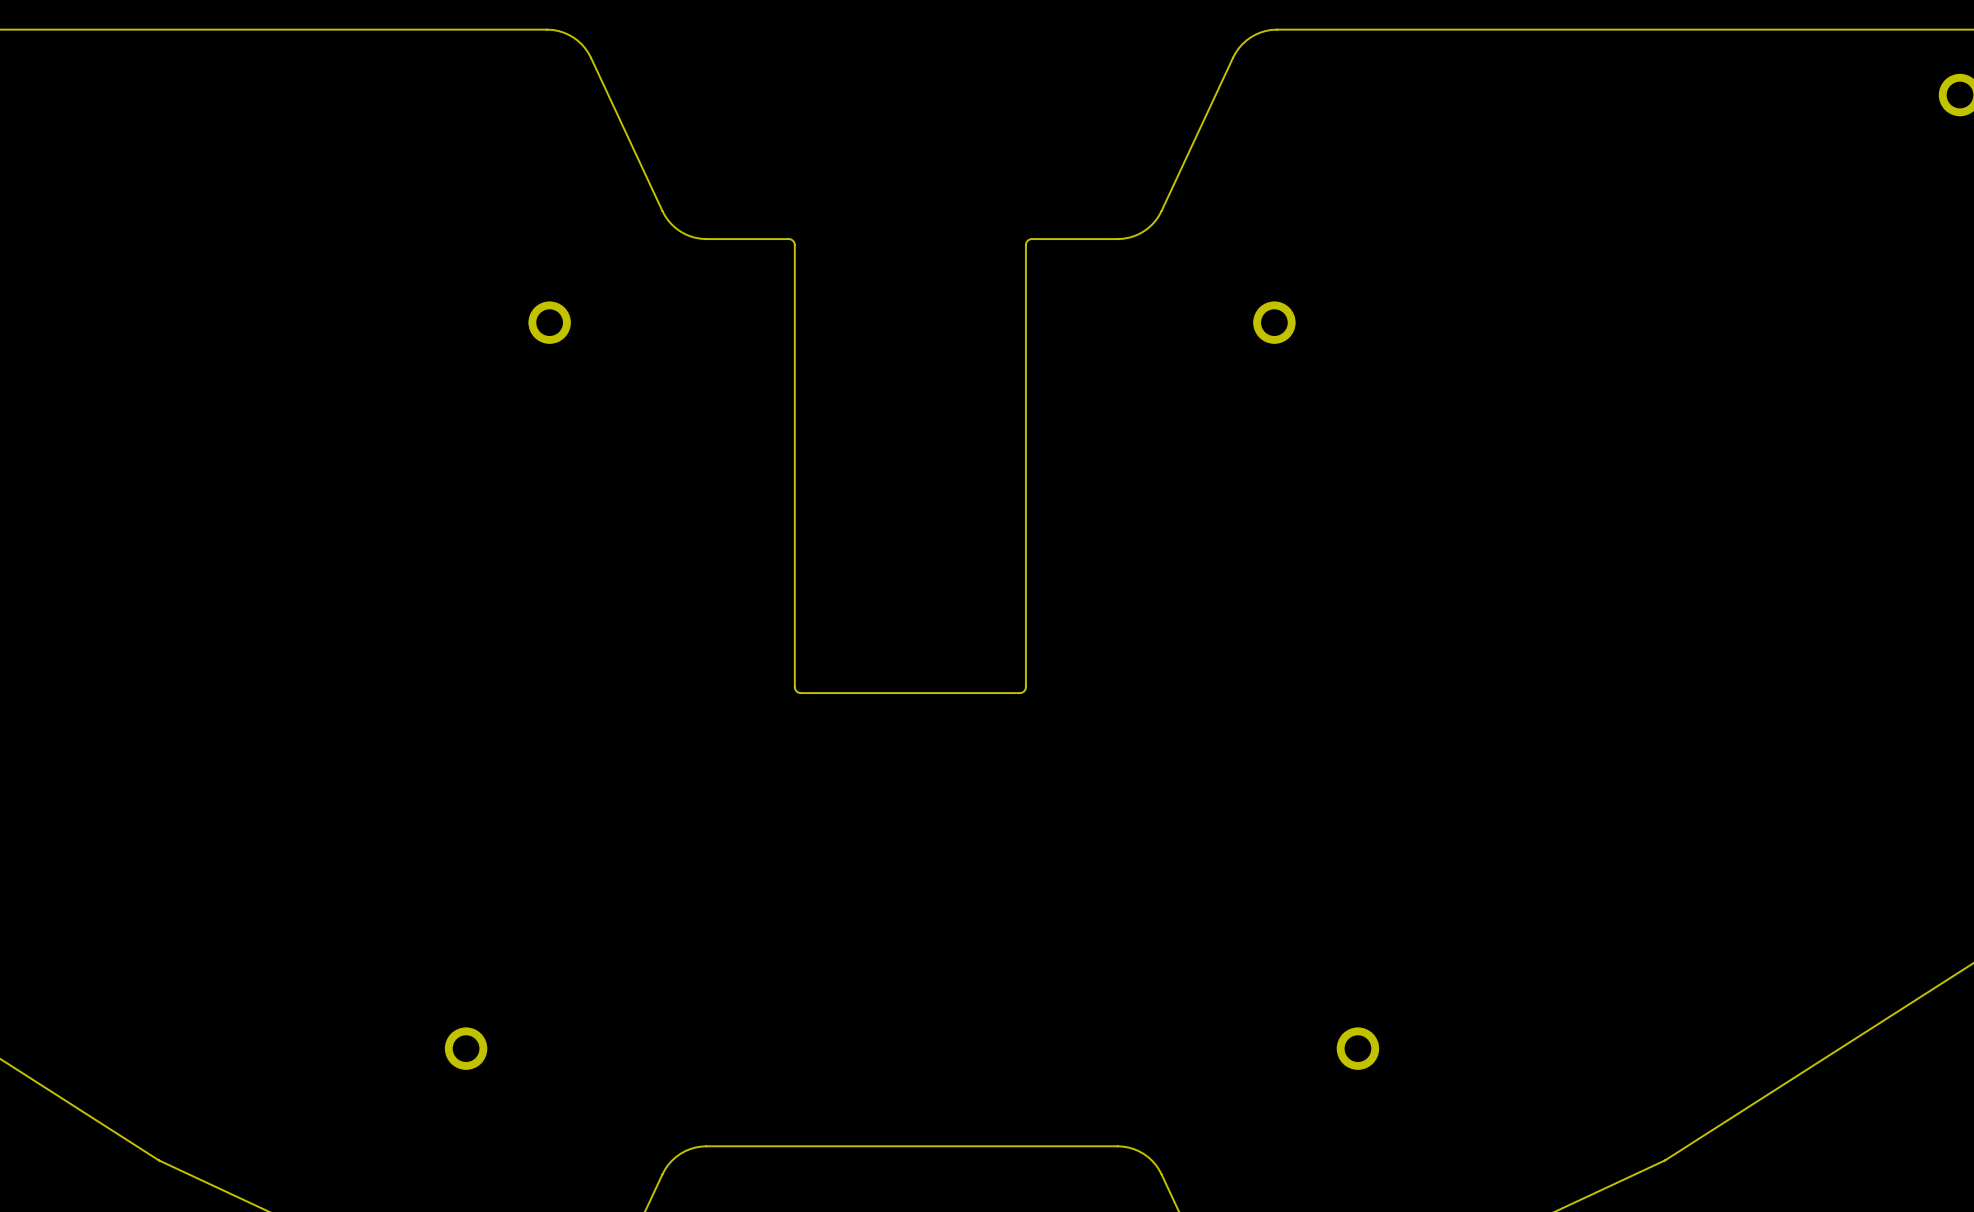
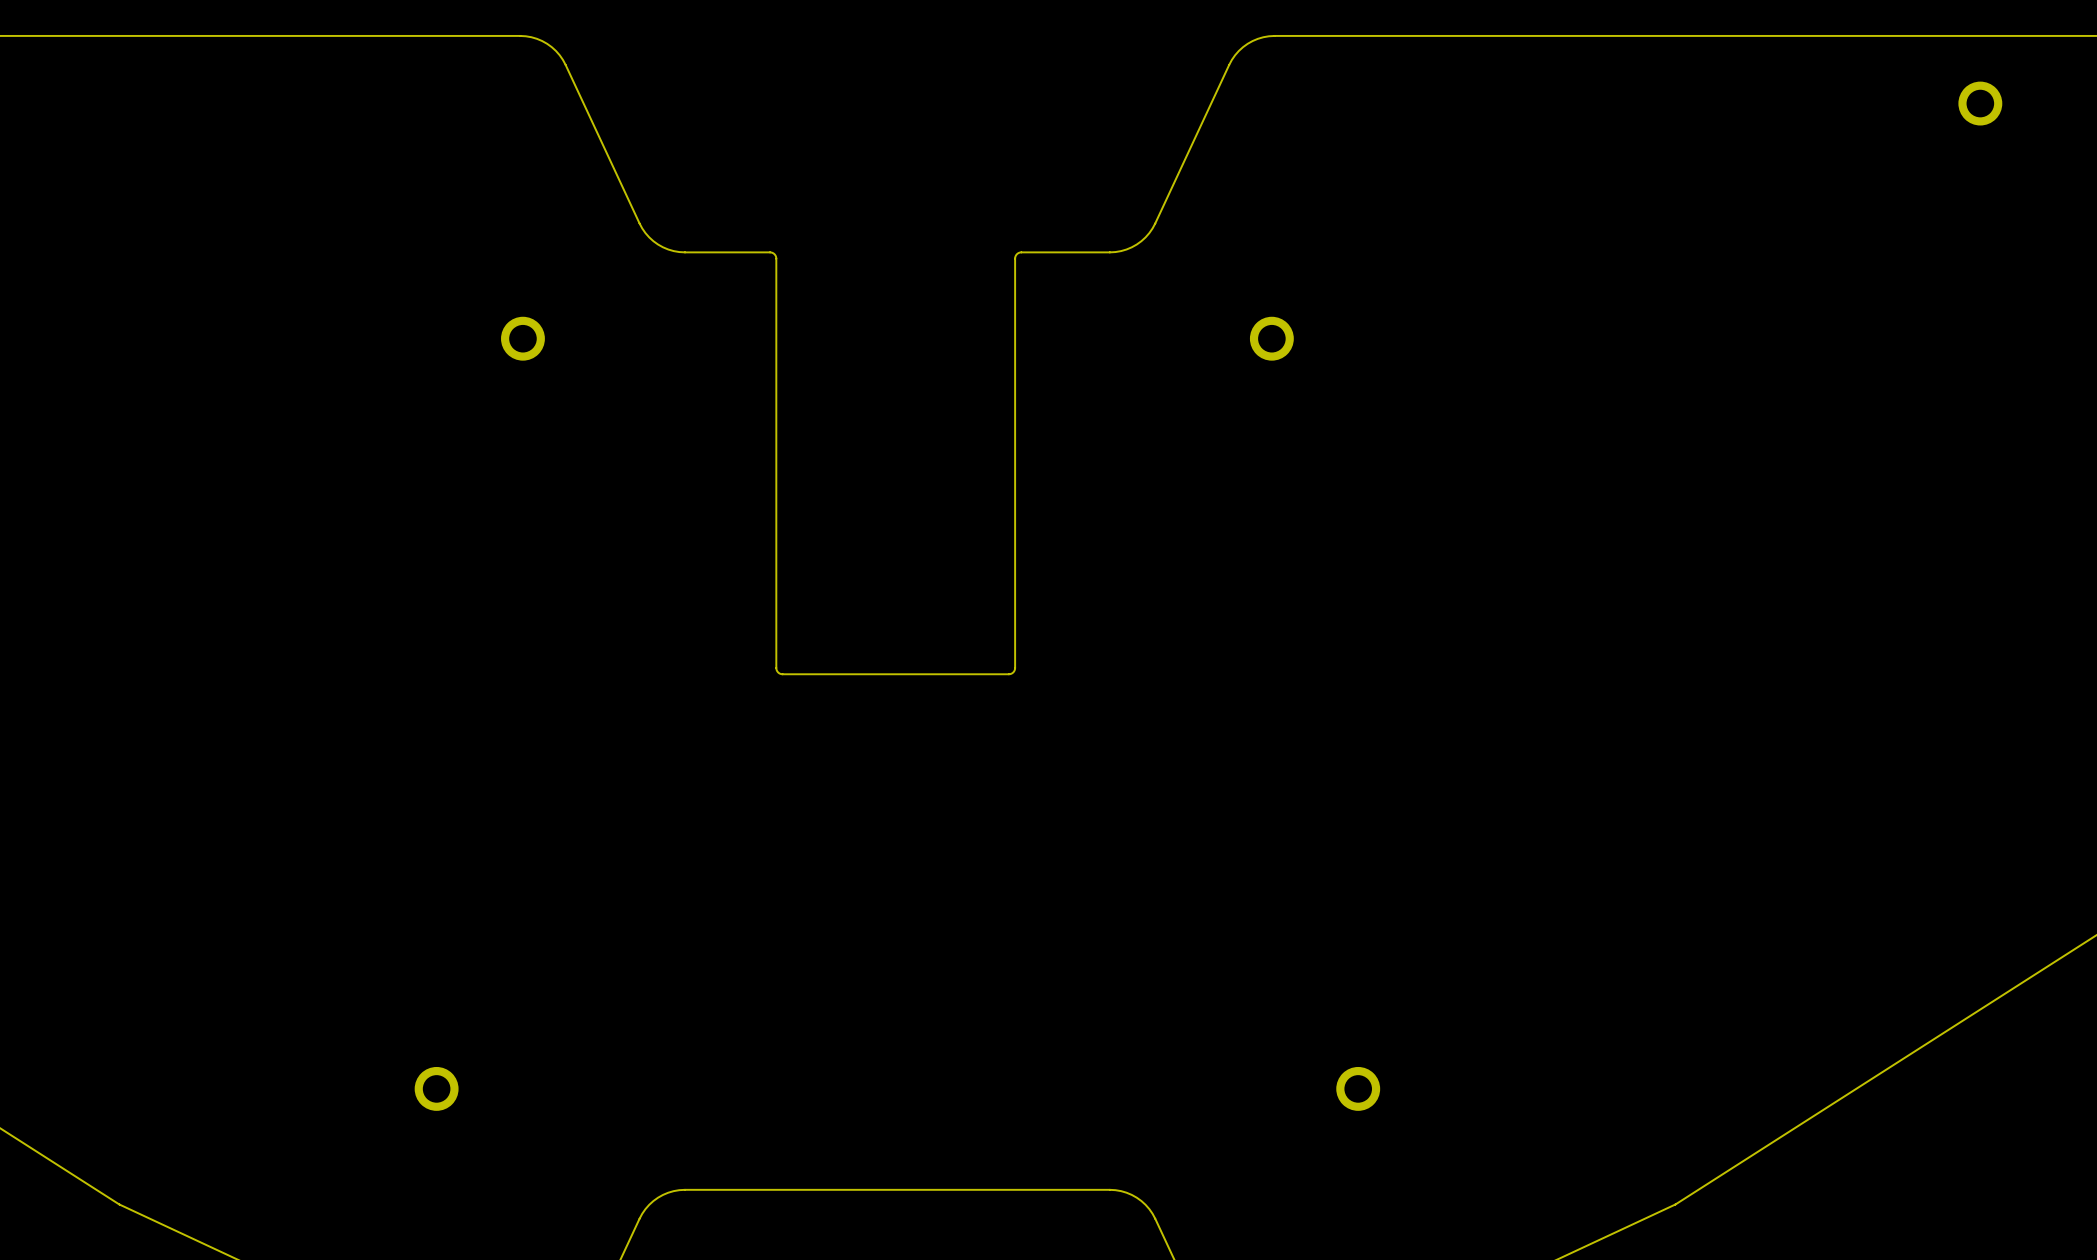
board edge: (794, 641) (794, 687) (800, 693) (1021, 692) (1025, 687) (1025, 641) -> (776, 667) (778, 672) (782, 674) (1008, 674) (1013, 672) (1015, 667)

